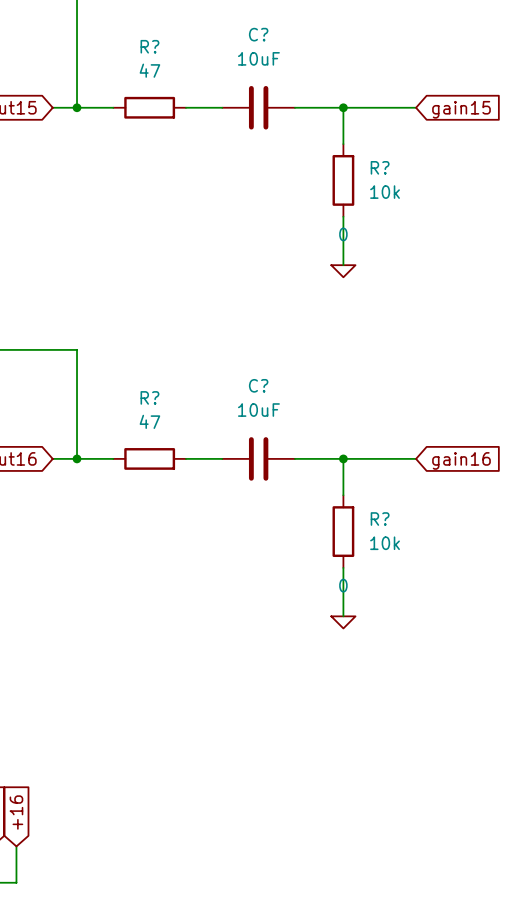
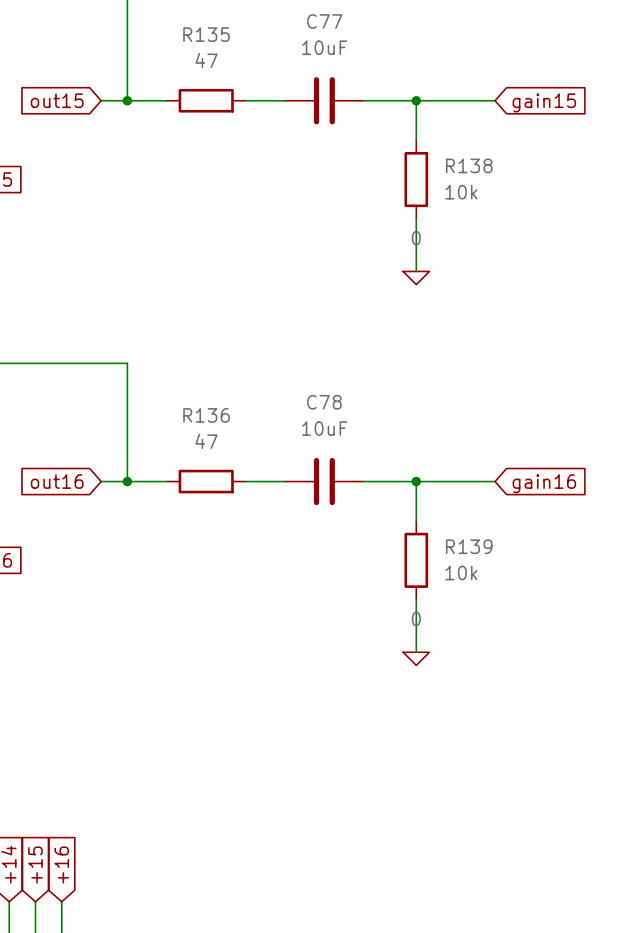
C? name: C? (258, 34) -> C77 (324, 21)
R? name: R? (149, 46) -> R135 (206, 34)
R? name: R? (380, 167) -> R138 (469, 165)
C? name: C? (258, 385) -> C78 (324, 402)
R? name: R? (149, 397) -> R136 (206, 415)
R? name: R? (380, 519) -> R139 (469, 546)

